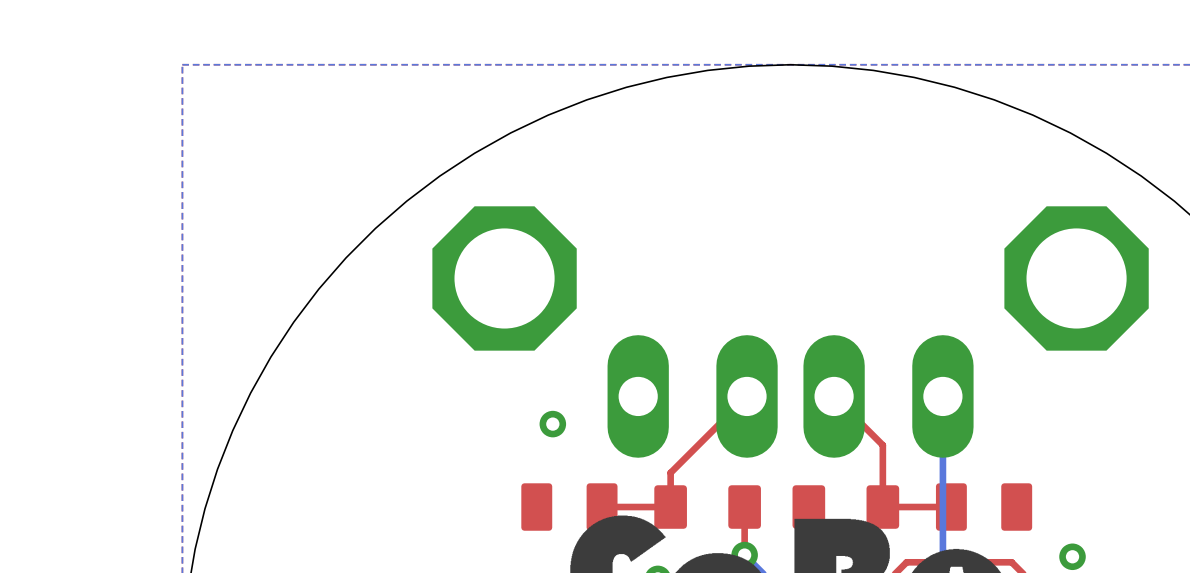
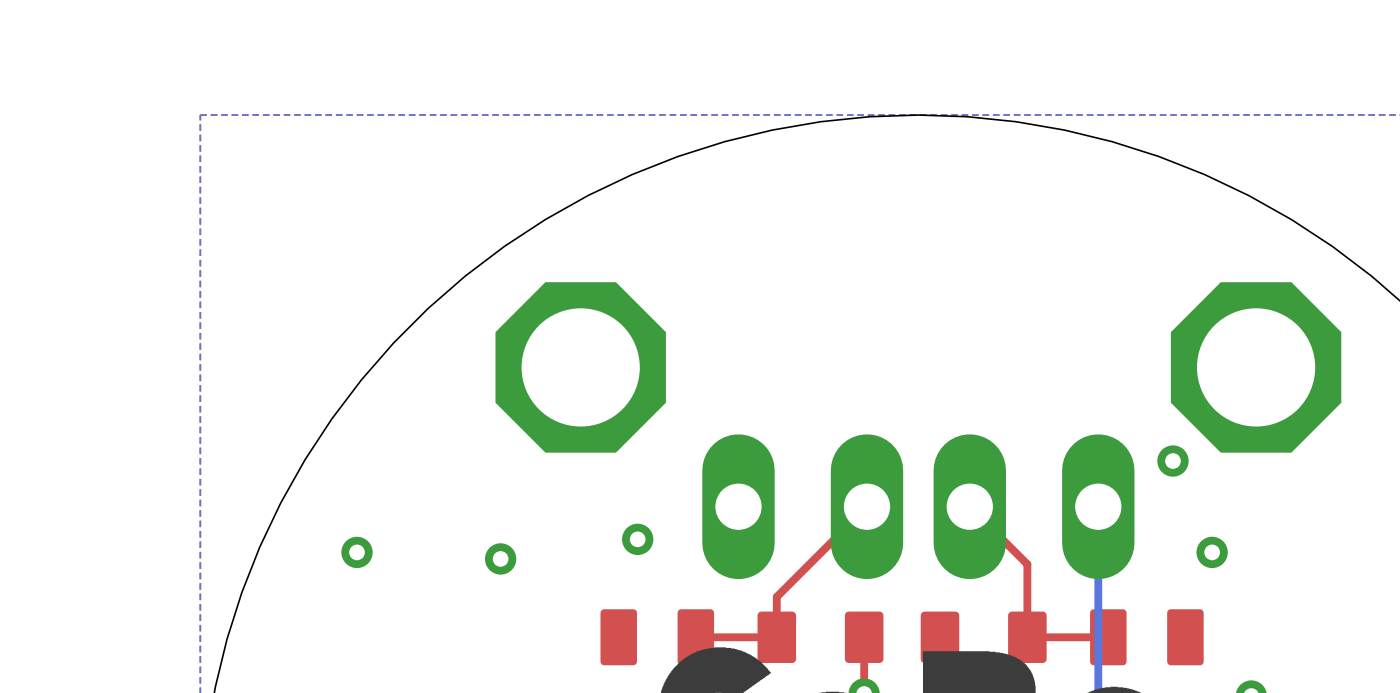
via: none -> (1172, 461)
via: none -> (357, 552)
via: none -> (1212, 552)
via: none -> (500, 558)

